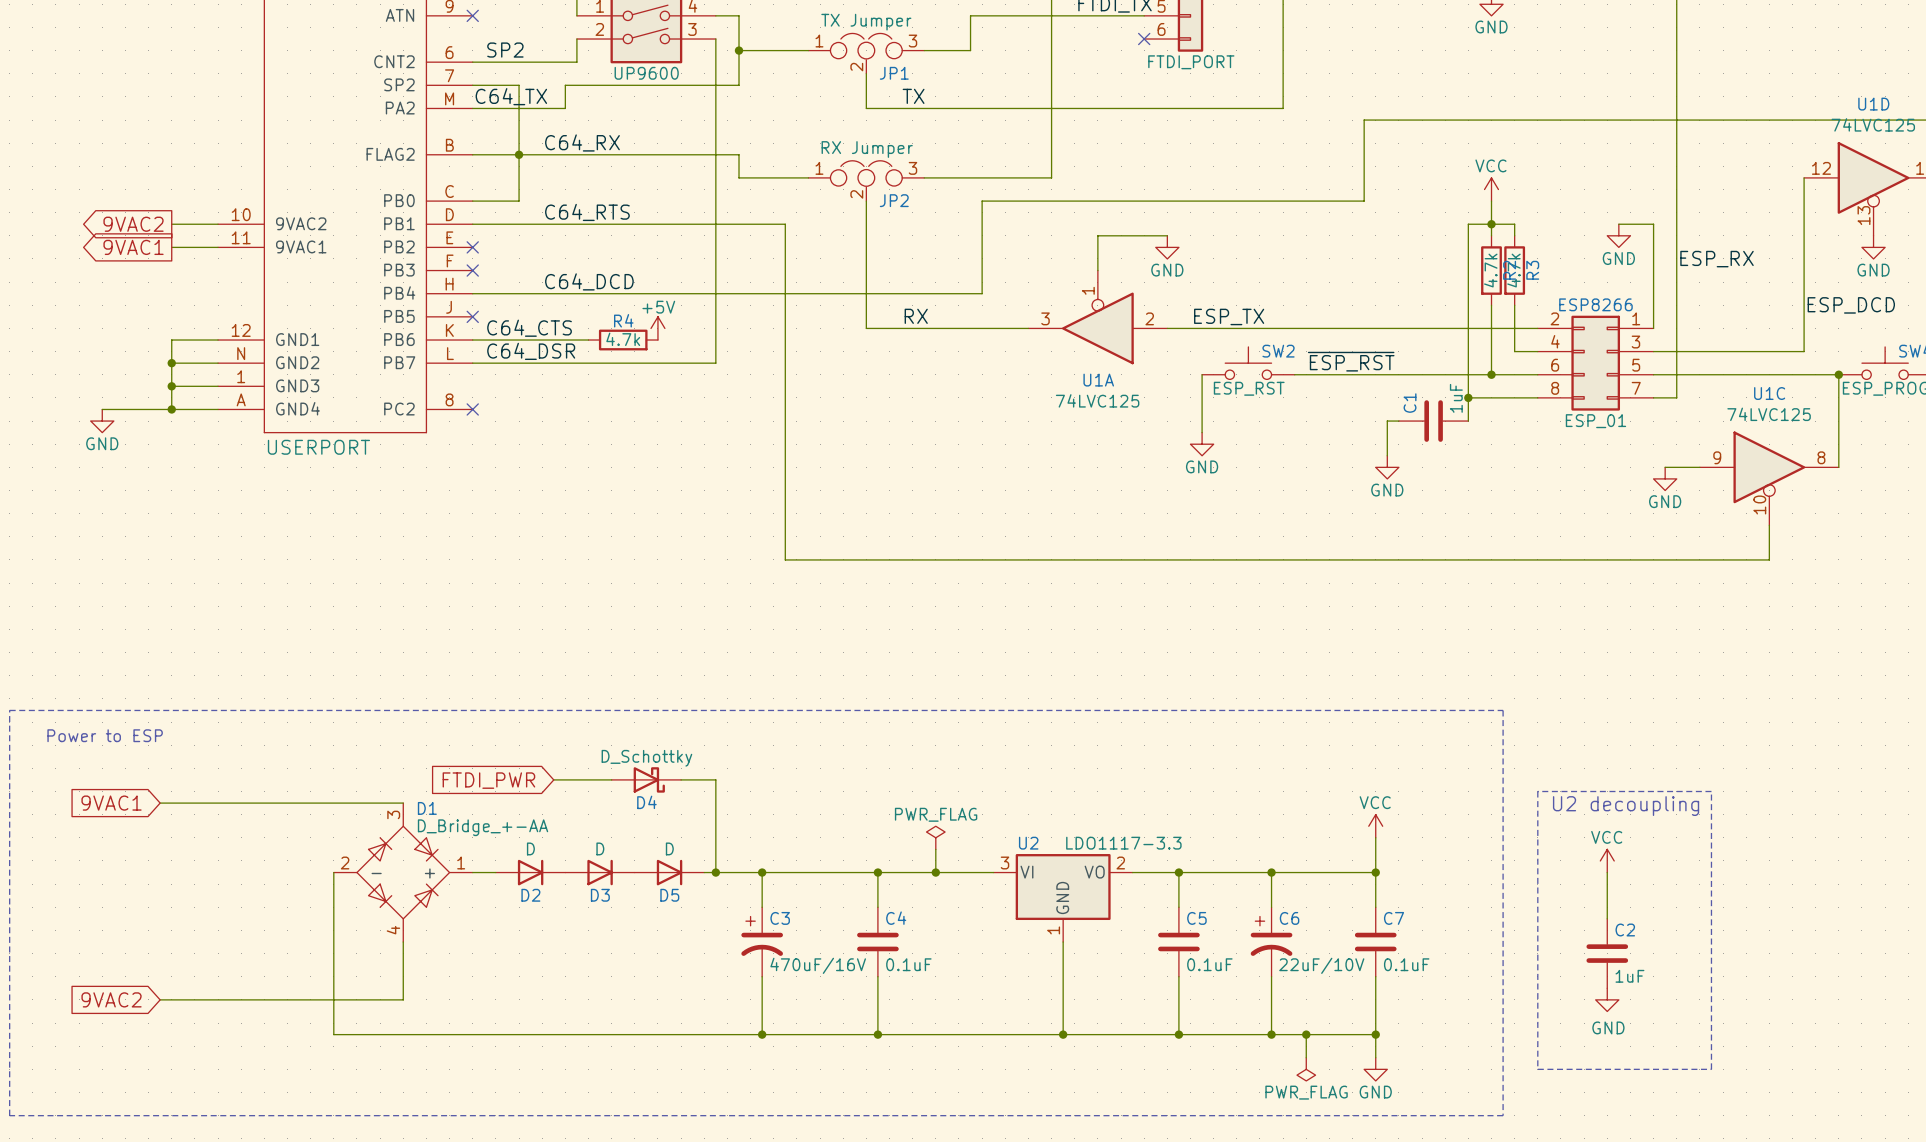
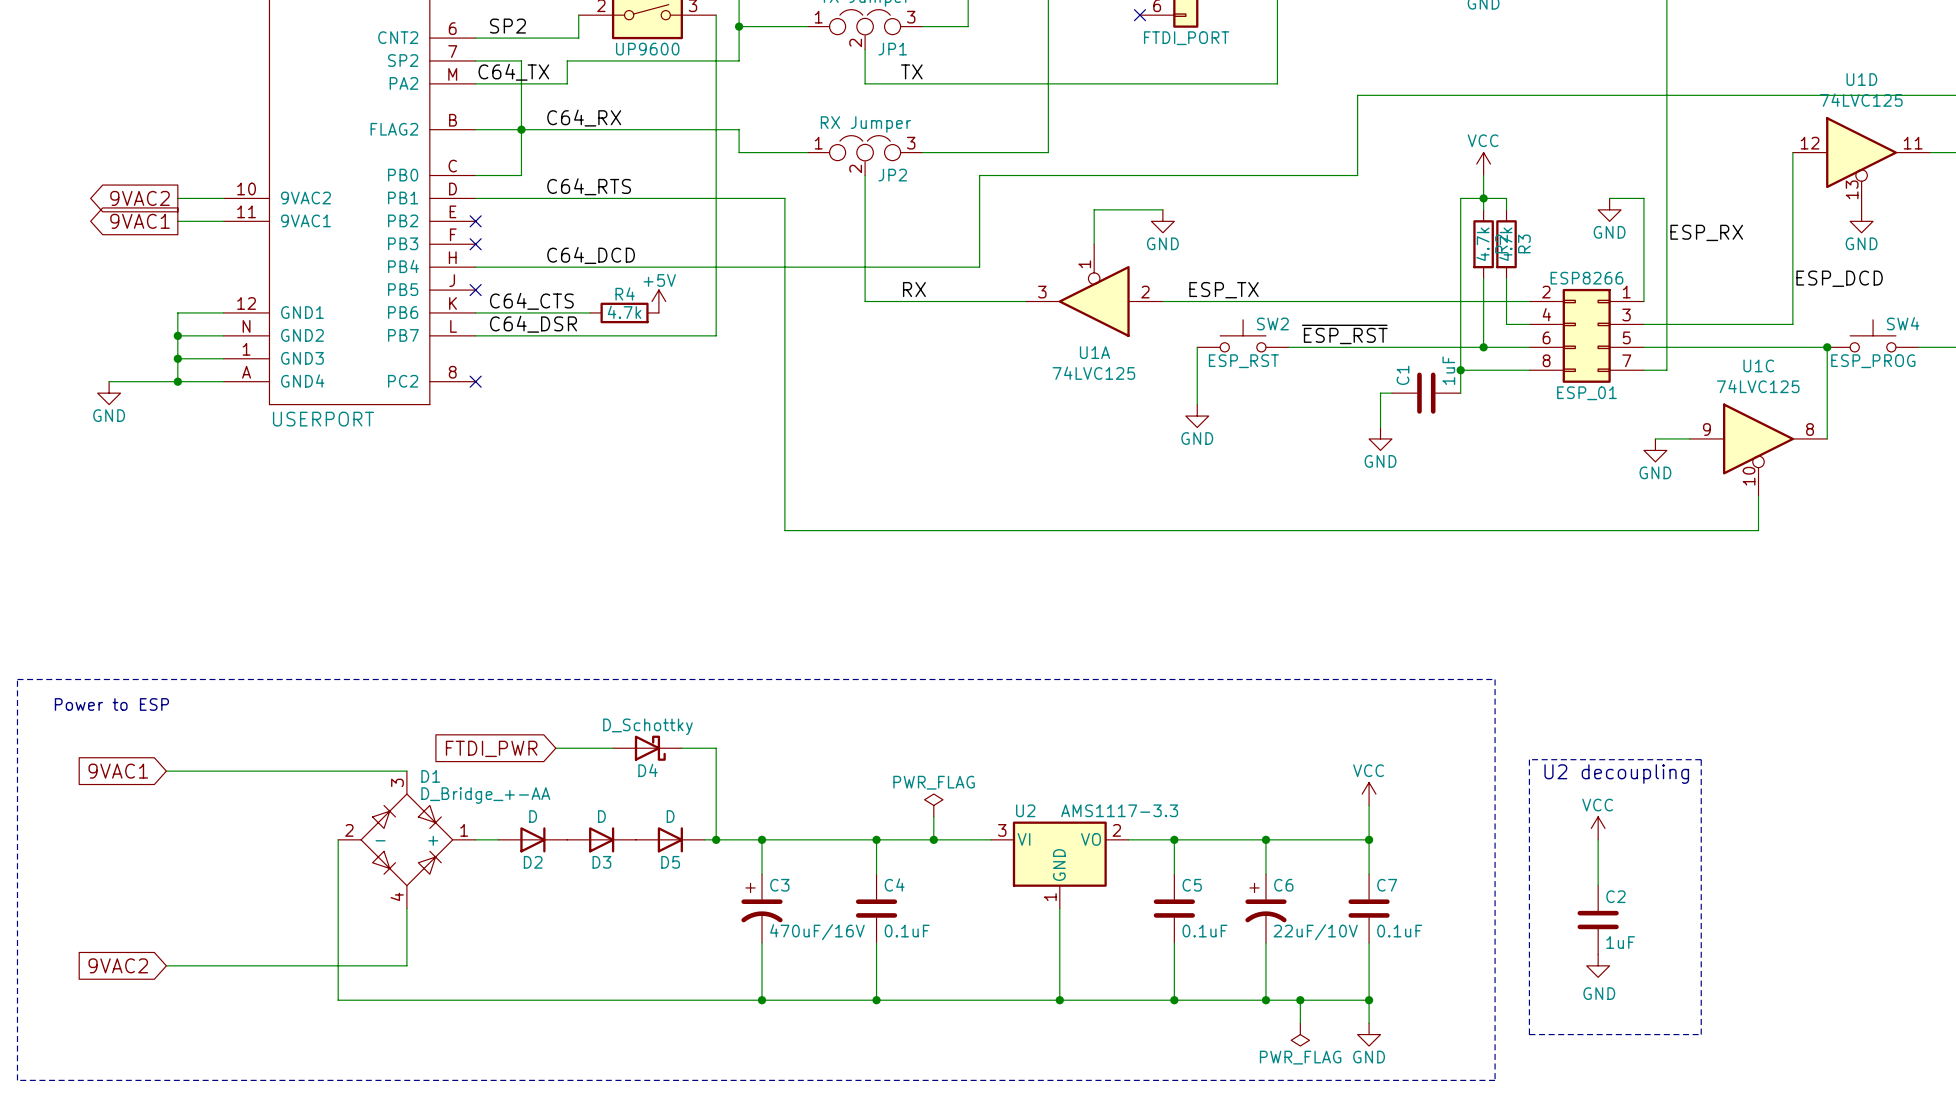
U2 value: LDO1117-3.3 (1123, 843) -> AMS1117-3.3 (1119, 810)

